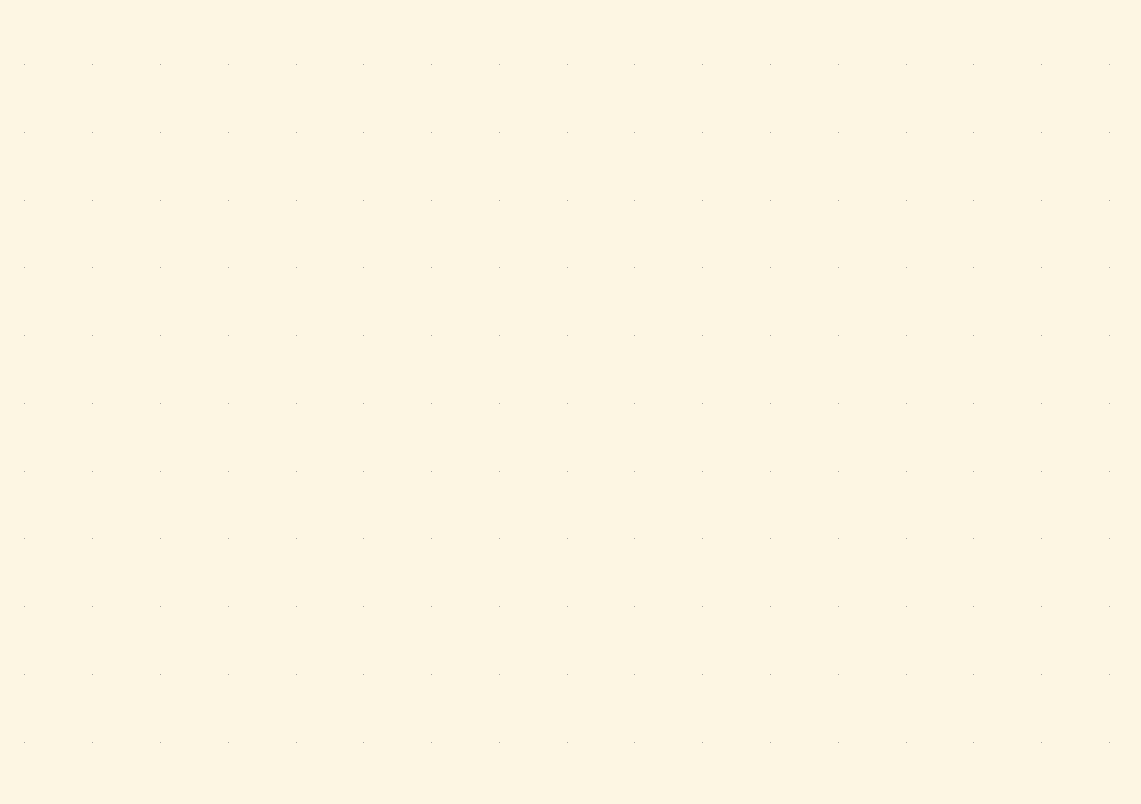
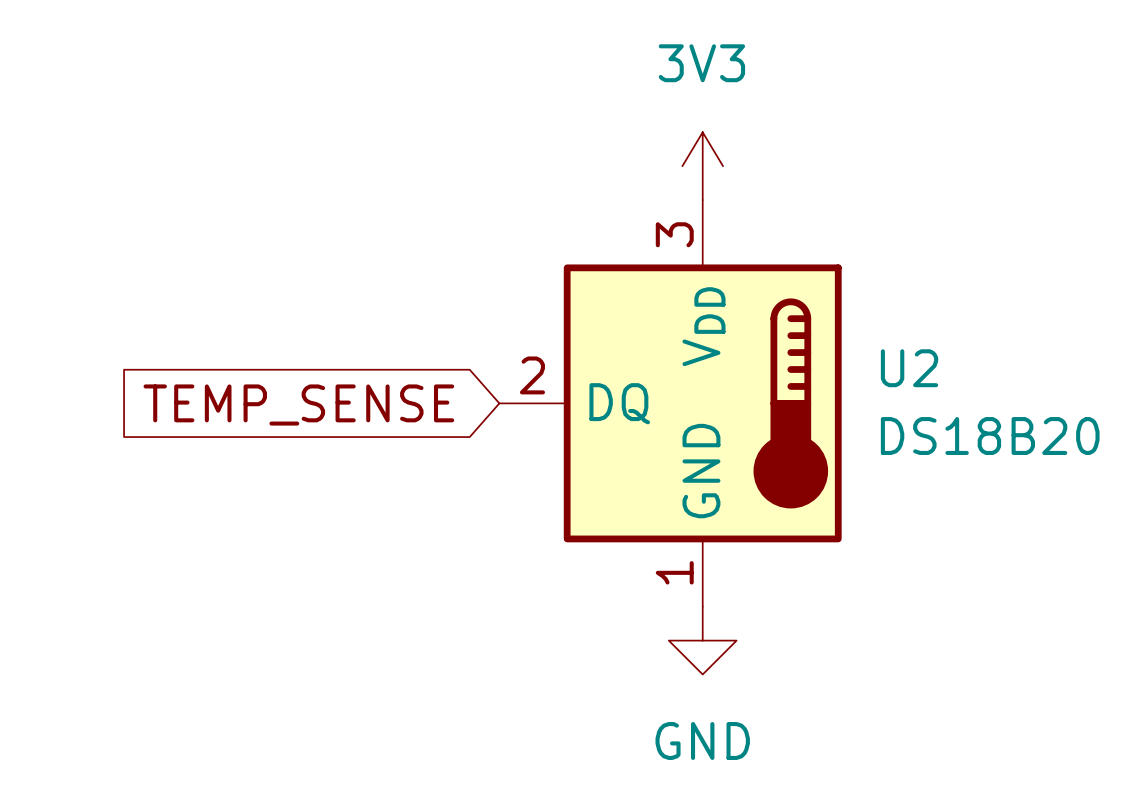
power symbol: none -> 3V3 (702, 166)
global label: none -> TEMP_SENSE (298, 405)
U2: none -> DS18B20 (670, 403)
power symbol: none -> GND (702, 640)

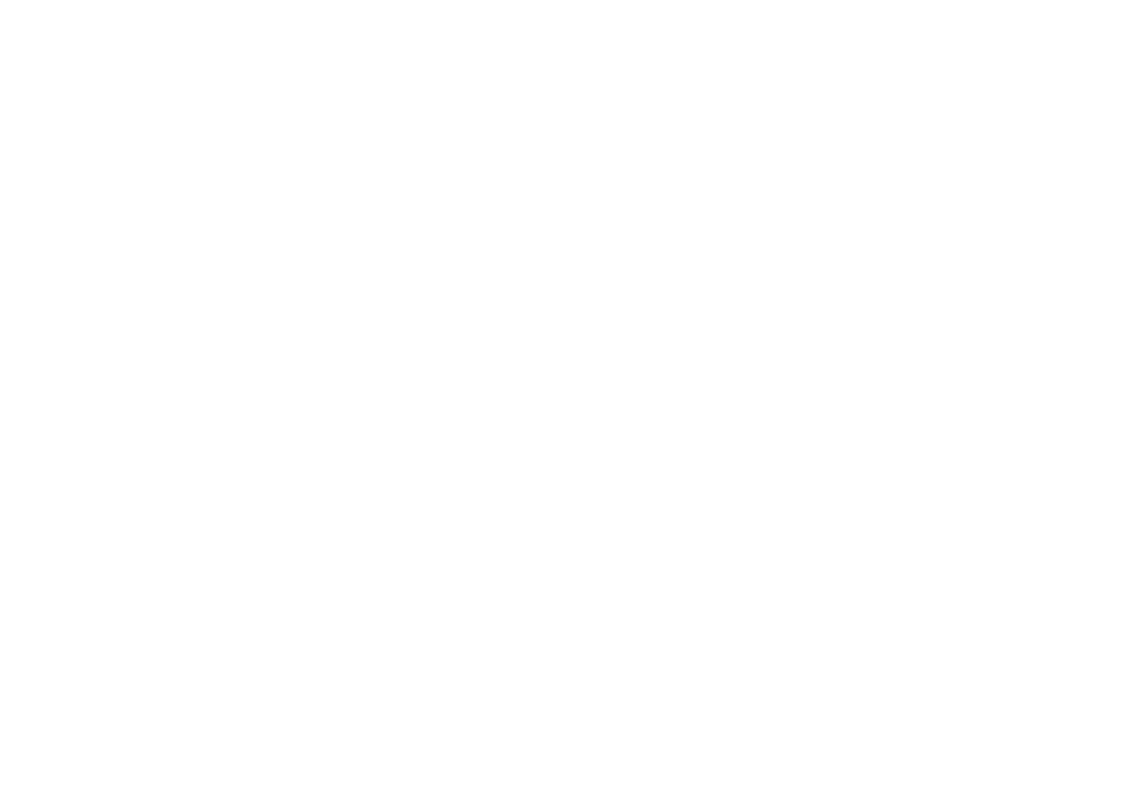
power symbol: 3V3 (702, 166) -> none
U2: DS18B20 (670, 403) -> none
global label: TEMP_SENSE (298, 405) -> none
power symbol: GND (702, 640) -> none

